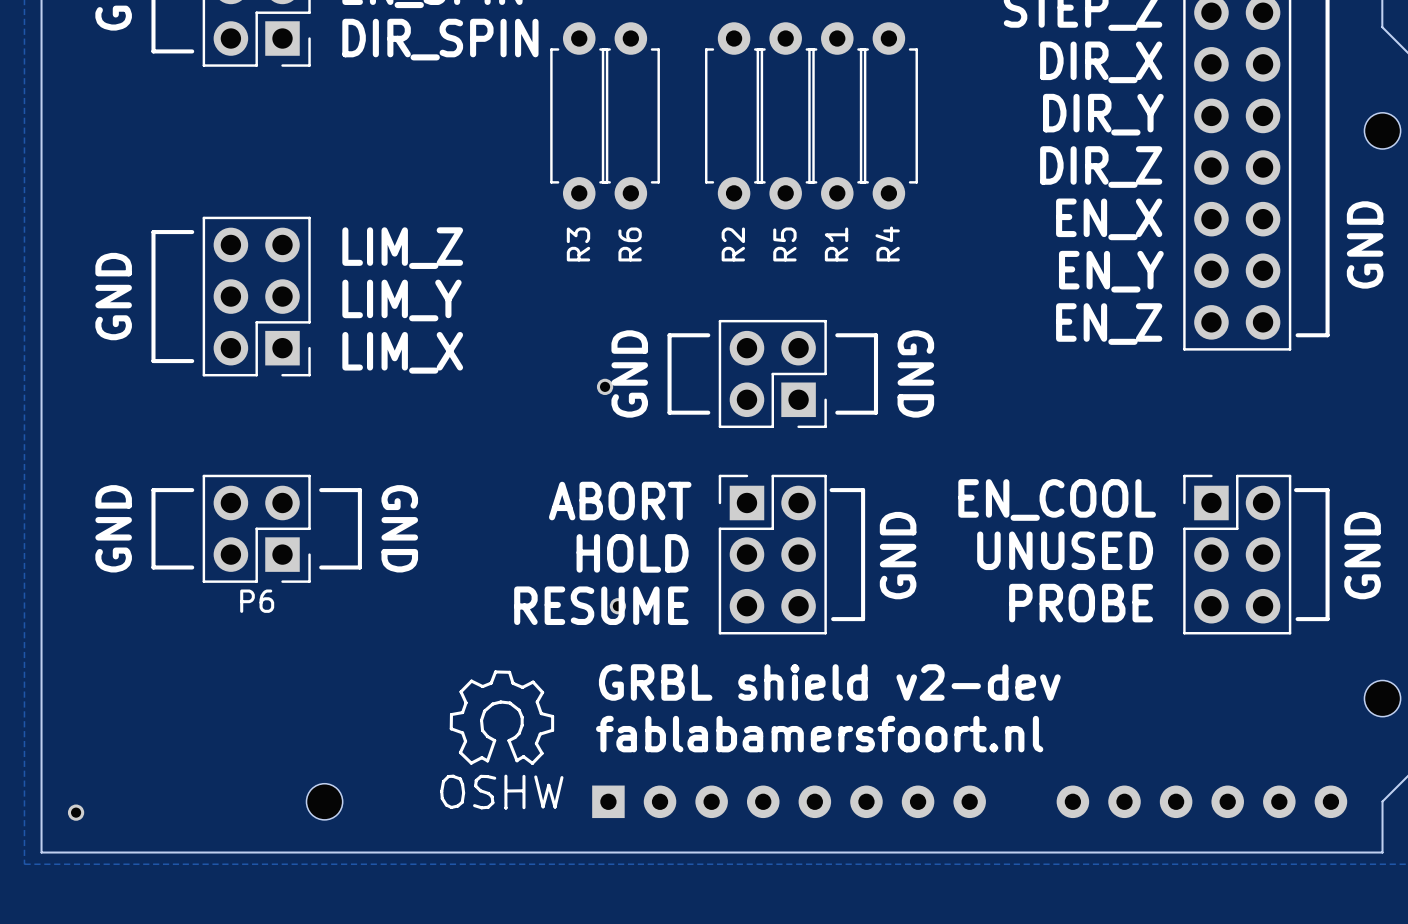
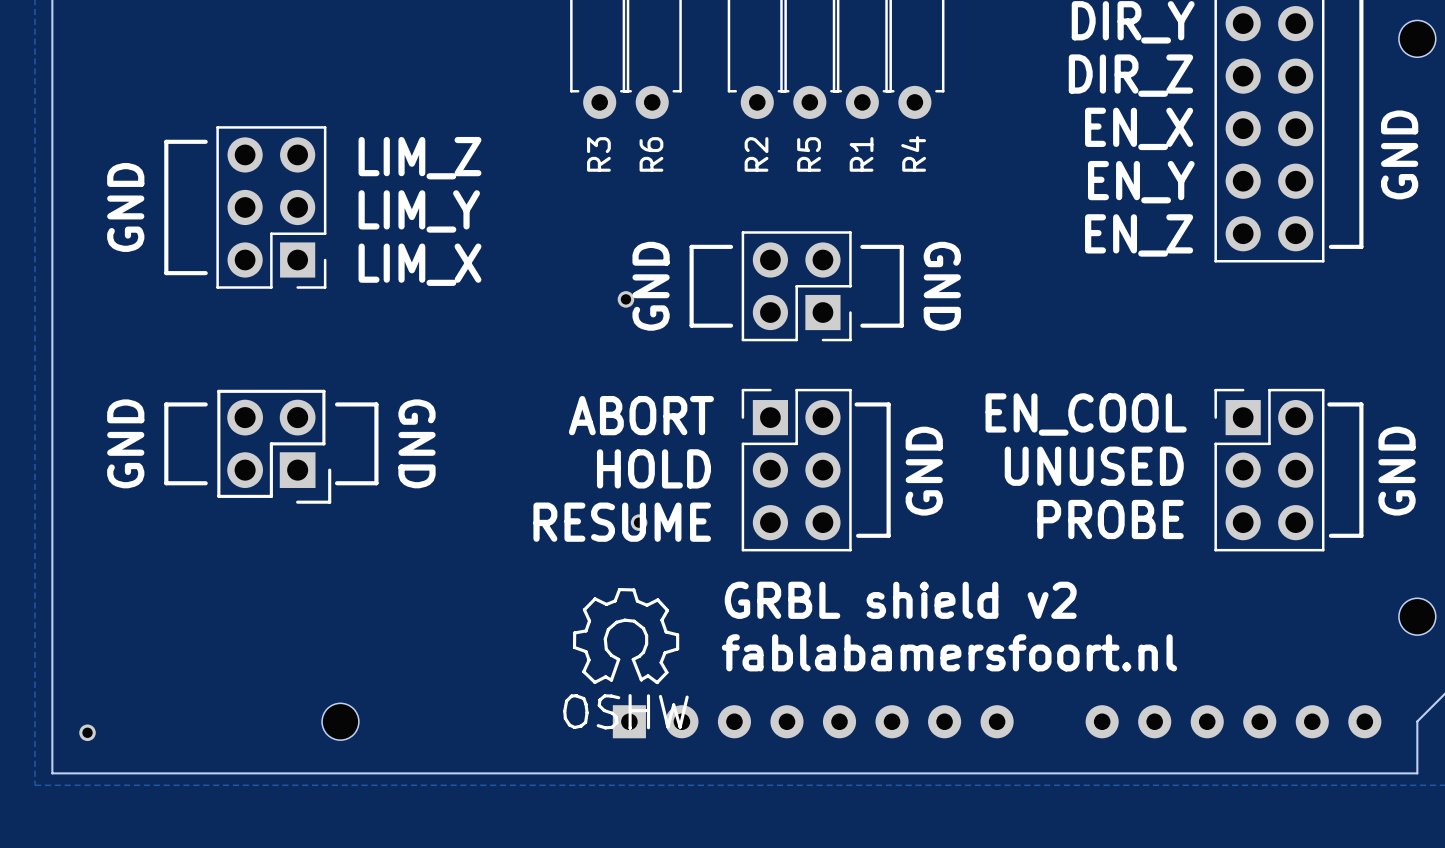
P6: (256, 528) -> none
part: none -> (274, 446)
text: GRBL shield v2-dev (829, 682) -> GRBL shield v2 (900, 600)
text position: fablabamersfoort.nl (819, 734) -> fablabamersfoort.nl (949, 652)
drawing position: (501, 740) -> (625, 658)

